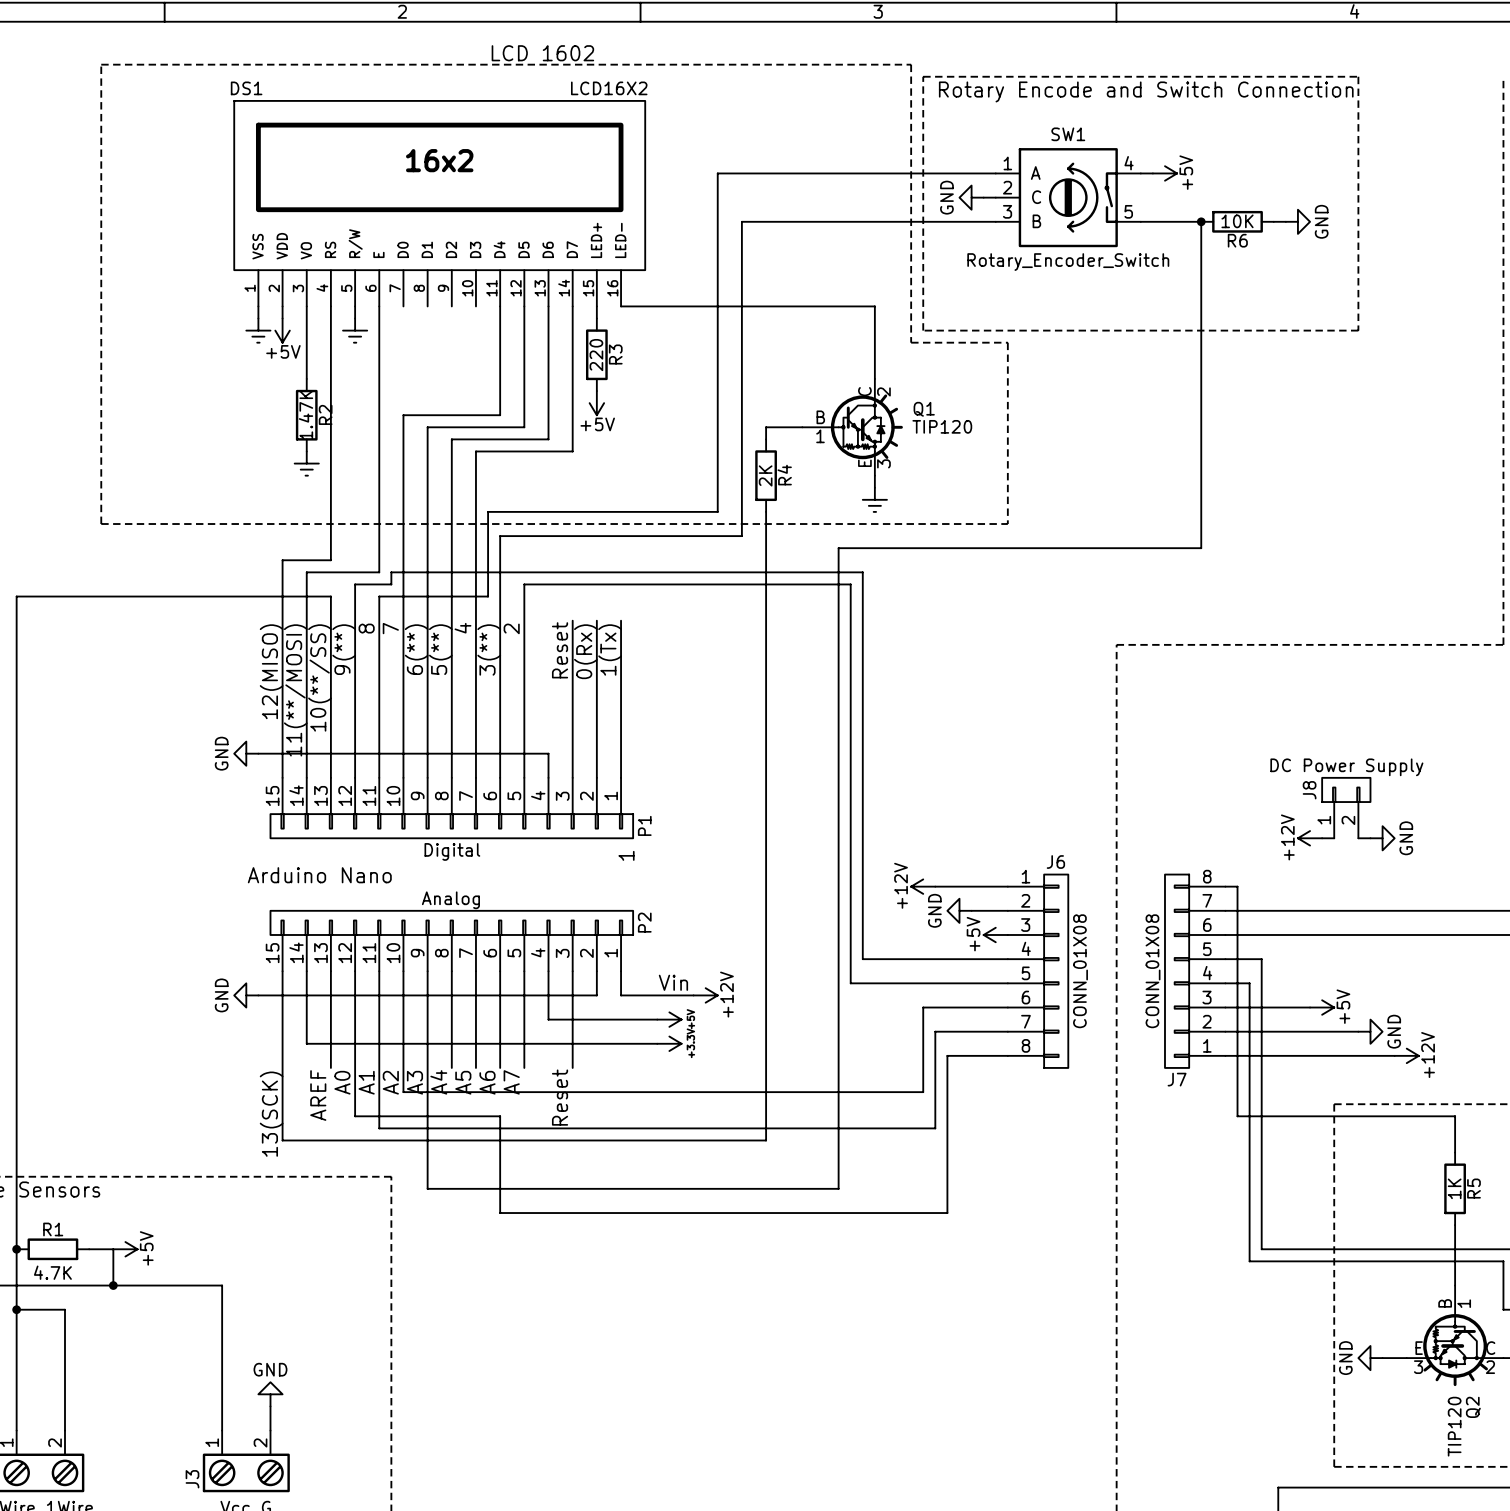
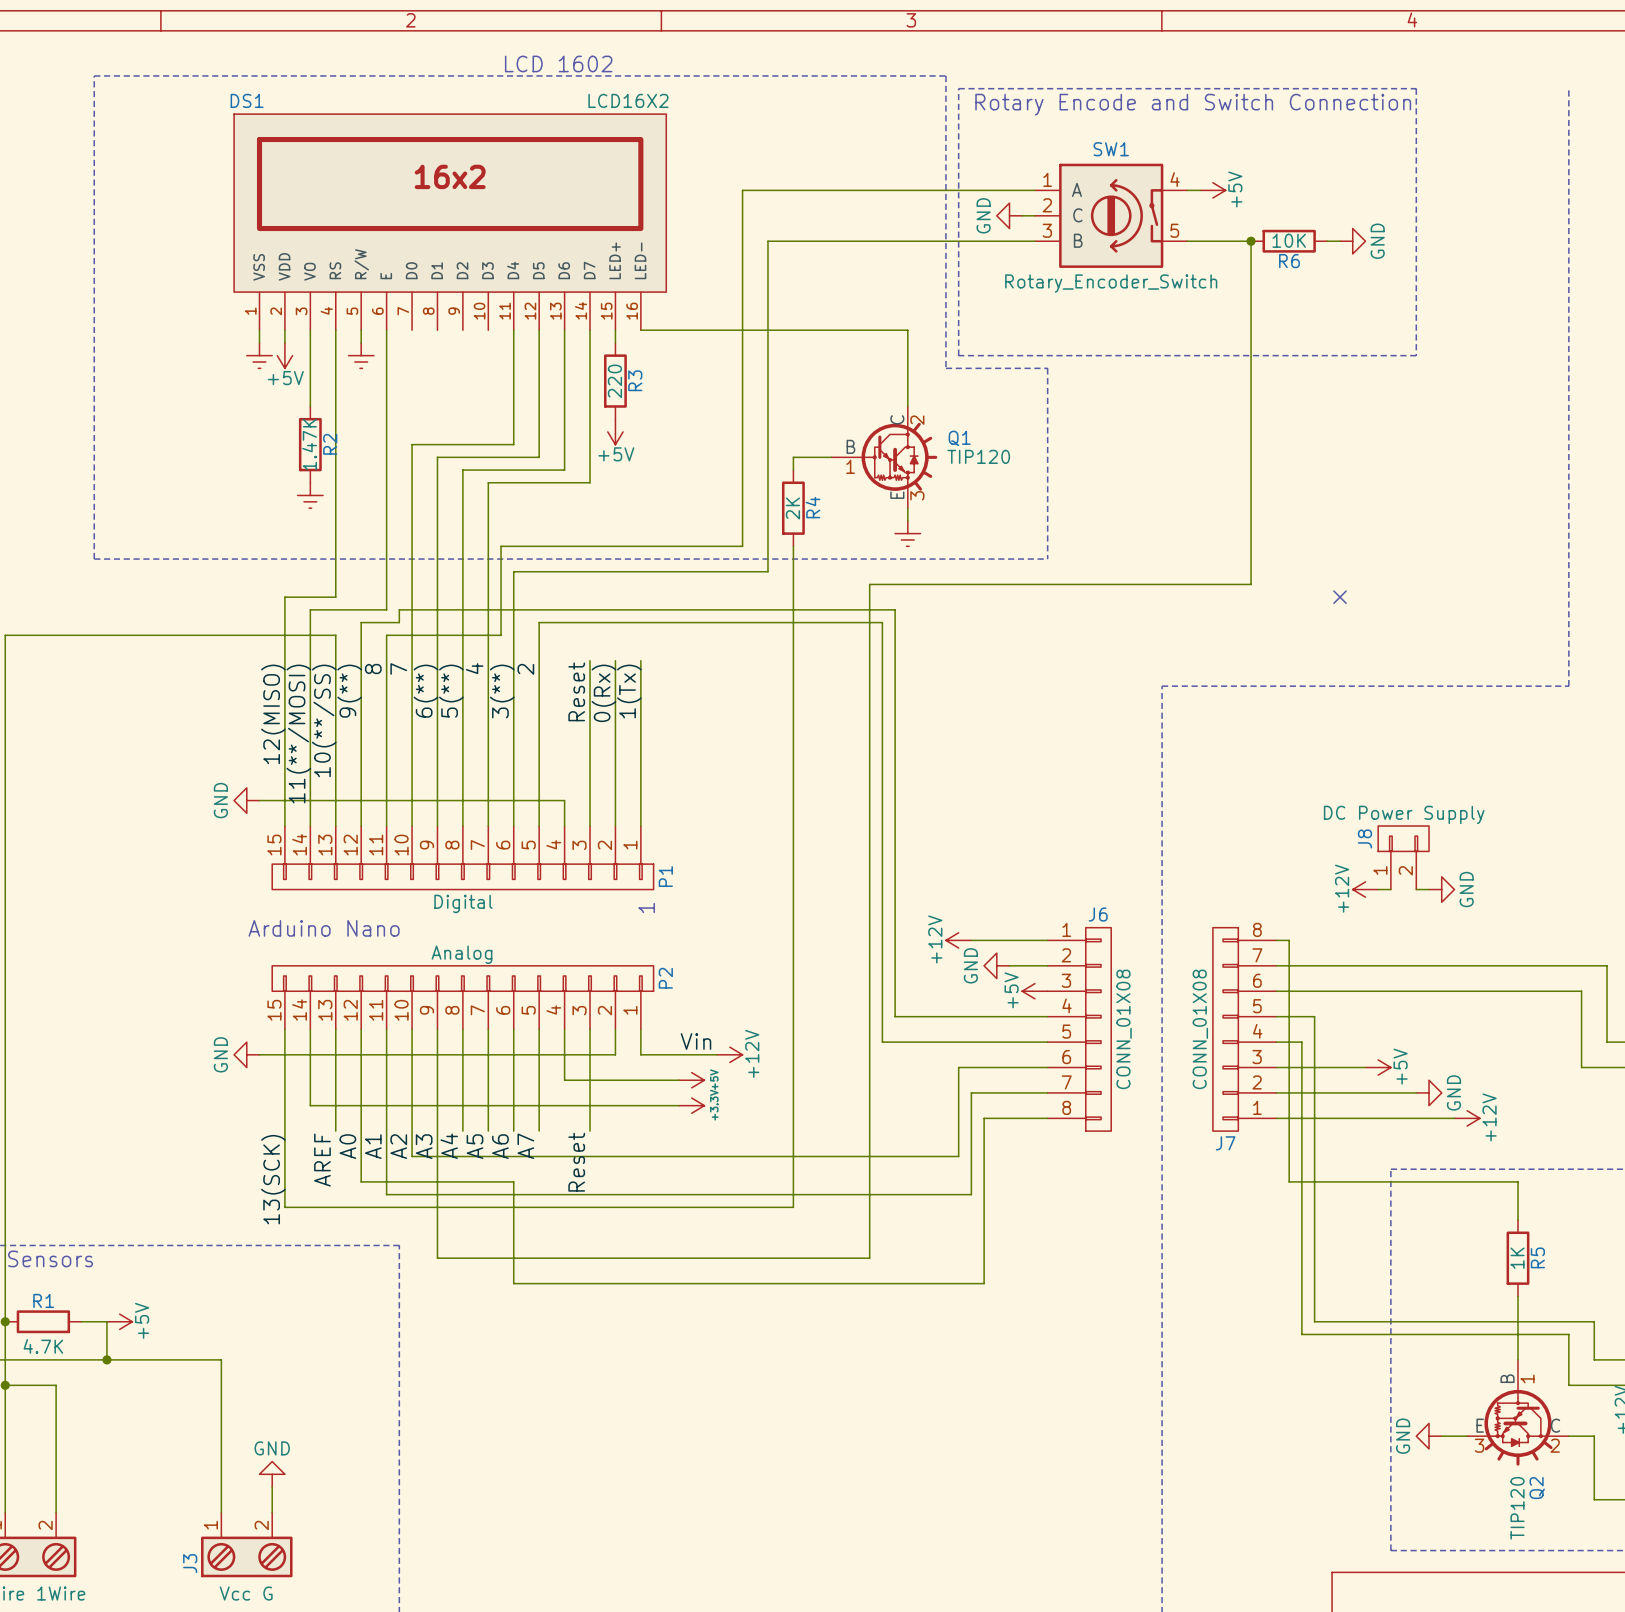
no-connect mark: none -> (1340, 597)

